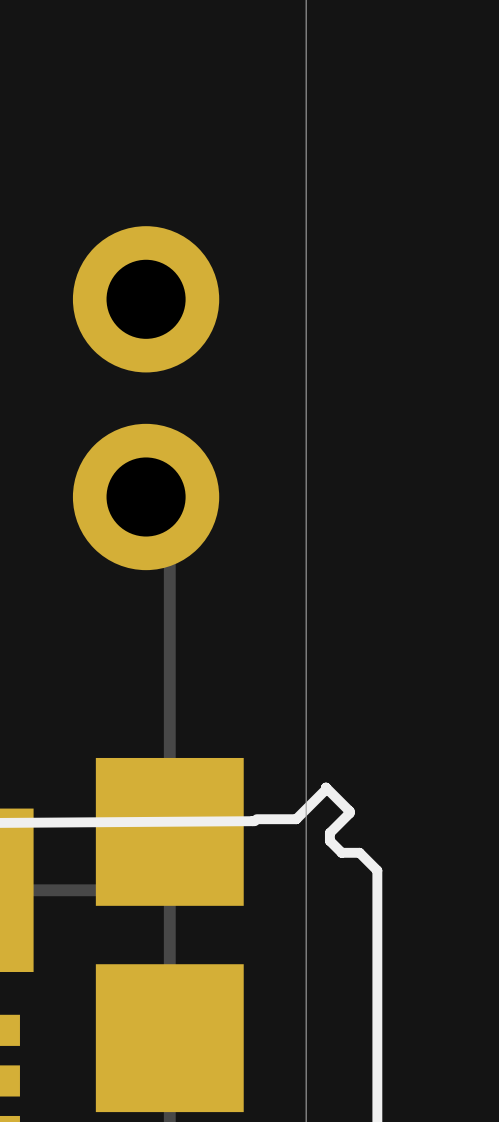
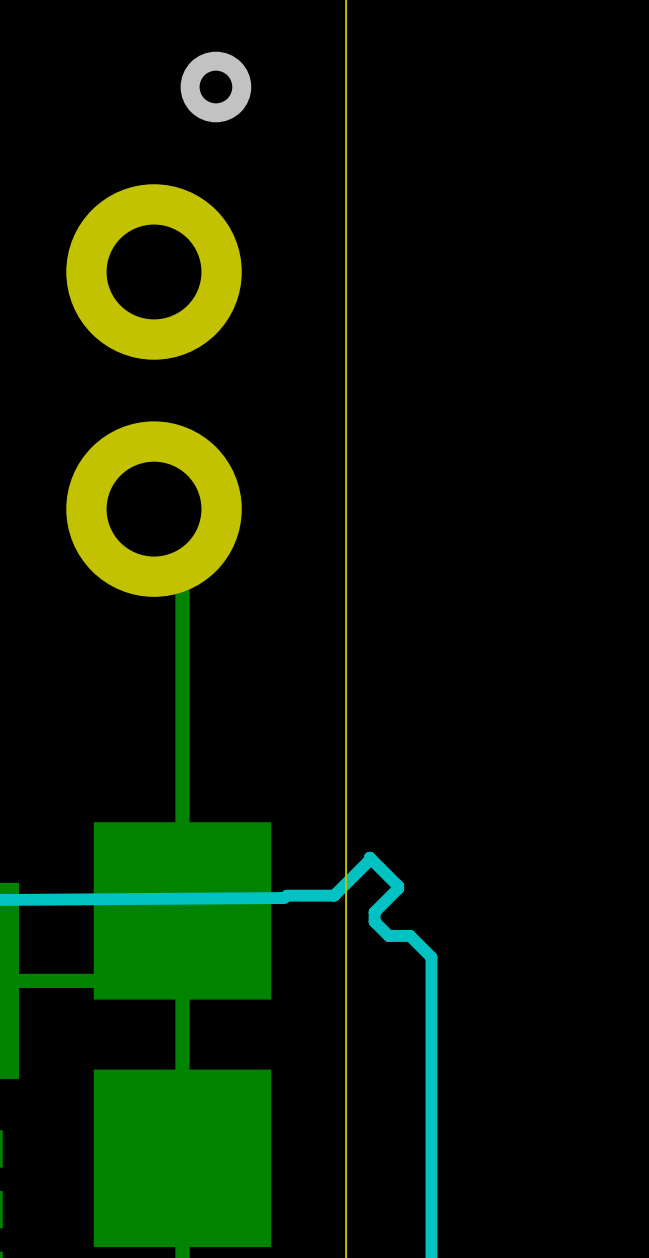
via: none -> (215, 87)

